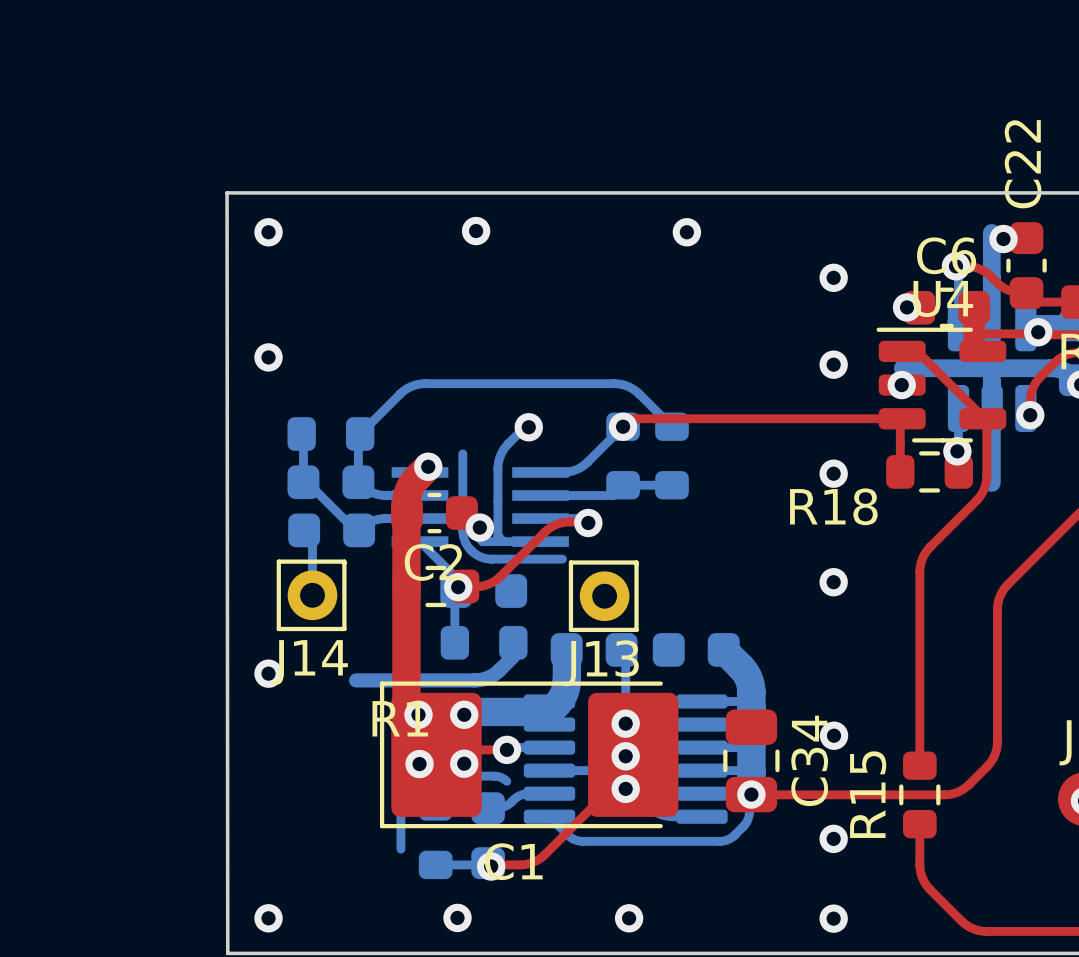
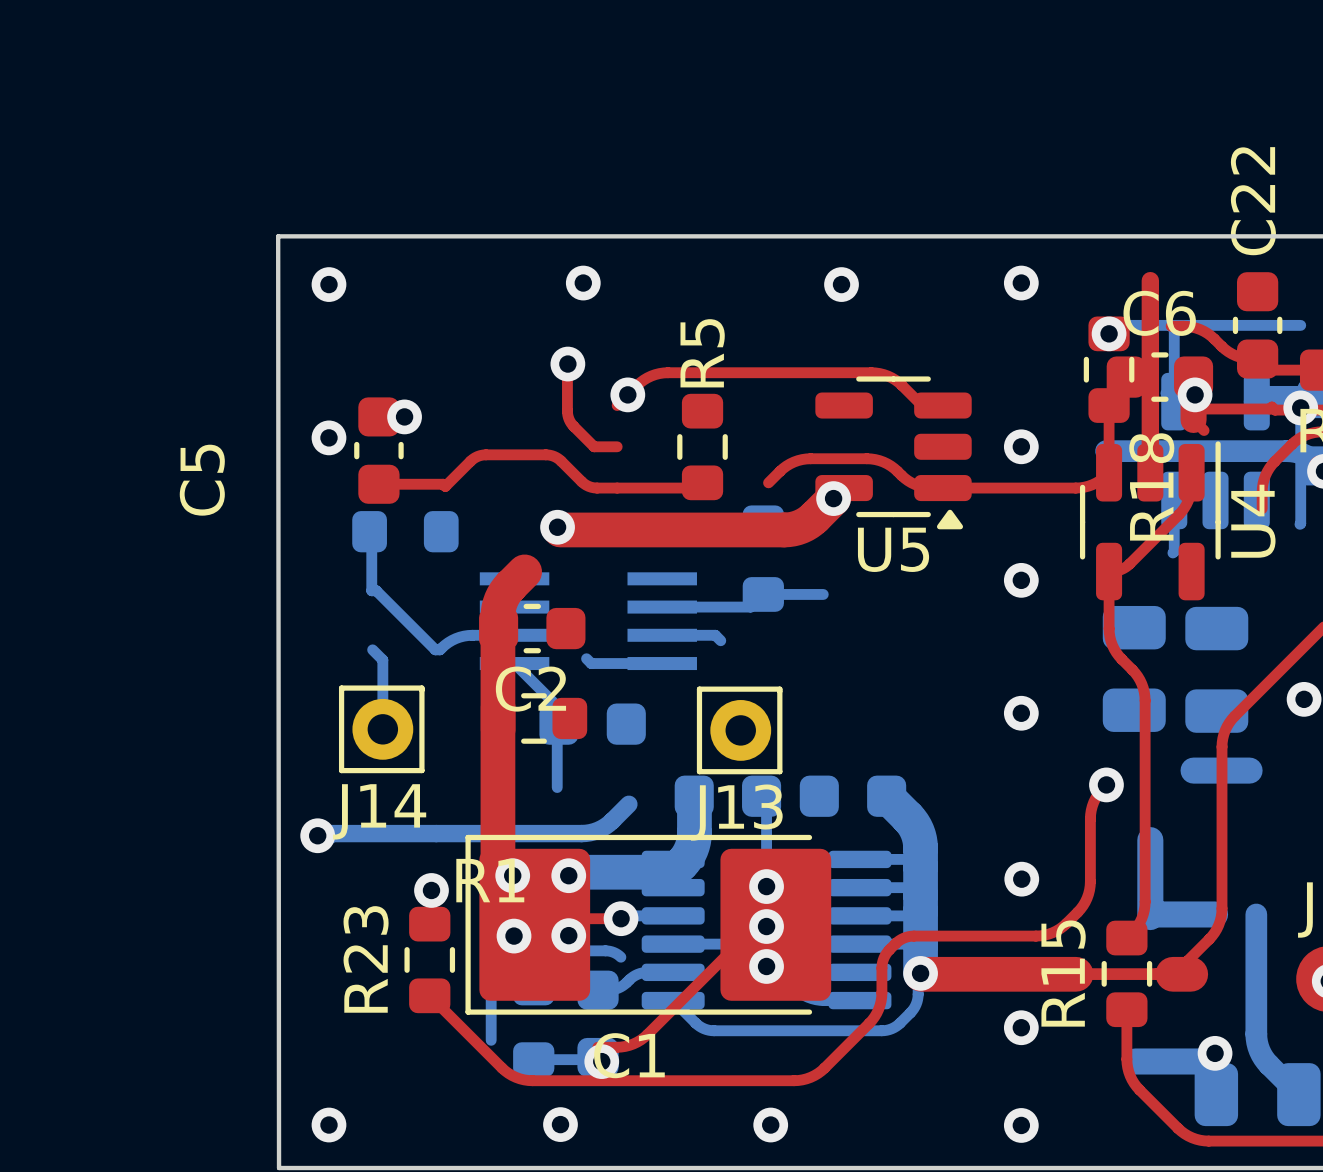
top track: none -> (1150, 280) (1150, 472)
via: none -> (1021, 283)
bottom track: (991, 232) (991, 482) -> none
via: (1003, 239) -> none
bottom track: none -> (1300, 325) (1117, 325) (1109, 333)
via: (955, 266) -> none
via: none -> (1109, 333)
via: (833, 277) -> none
top track: none -> (567, 353) (567, 411) (570, 421) (594, 446) (617, 446)
via: none -> (567, 364)
via: (907, 307) -> none
via: none -> (627, 394)
via: none -> (1195, 394)
top track: none -> (617, 405) (643, 380) (655, 374) (667, 372) (875, 372) (895, 380) (922, 405) (942, 405)
top track: none -> (1109, 405) (1109, 472) (1096, 482) (1084, 487) (927, 487) (911, 482) (887, 463) (866, 458) (802, 459) (786, 466) (768, 482)
via position: (1038, 332) -> (1300, 407)
bottom track: none -> (1300, 407) (1299, 524)
via: none -> (404, 416)
top track: (902, 351) (917, 351) (986, 422) (986, 475) (984, 489) (976, 500) (927, 549) (920, 565) (919, 765) -> (1191, 472) (1189, 496) (1181, 511) (1127, 565) (1118, 570) (1109, 571) (1109, 628) (1110, 641) (1118, 656) (1139, 680) (1145, 700) (1144, 906) (1139, 922) (1126, 938)
U5: none -> (893, 452)
via: (901, 385) -> none
U4 rotation: 0° (941, 385) -> 90° clockwise (1150, 520)
top track: none -> (702, 482) (697, 488) (594, 487) (583, 483) (559, 459) (552, 455) (485, 454) (472, 459) (445, 486) (443, 484) (378, 484)
top track: none -> (844, 488) (811, 520) (800, 526) (788, 529) (560, 529) (557, 527)
via: (1030, 415) -> none
bottom track: (533, 419) (505, 446) (498, 461) (497, 536) (503, 541) -> none
top track: (623, 426) (631, 418) (902, 418) (900, 420) (900, 471) -> none
bottom track: (623, 426) (579, 468) (566, 472) (540, 472) -> none
via position: (623, 426) -> (833, 498)
bottom track: (671, 426) (636, 391) (621, 384) (414, 385) (402, 391) (358, 435) (358, 482) (369, 491) (379, 494) (420, 495) -> none
via: (528, 427) -> none
via: none -> (557, 527)
via: (957, 451) -> none
bottom track: (462, 453) (462, 533) (466, 543) (471, 550) -> none
R5 side: bottom (671, 455) -> top (702, 447)
via: (428, 466) -> none
R18 rotation: 0° (929, 471) -> 90° clockwise (1109, 369)
R18 position: (929, 471) -> (1109, 369)
C5 side: bottom (330, 482) -> top (378, 450)
R18 name position: R18 (833, 506) -> R18 (1151, 486)
top track: (592, 521) (566, 522) (552, 526) (495, 580) (482, 586) (462, 586) -> none
via: (588, 522) -> none
via: (479, 527) -> none
part: (331, 530) -> none
part: none -> (1134, 668)
part: none -> (1216, 669)
bottom track: (471, 550) (487, 558) (562, 559) -> none
via: none -> (1304, 699)
via: (458, 587) -> none
bottom track: none -> (1193, 770) (1249, 770)
top track: none -> (1106, 784) (1095, 798) (1091, 810) (1088, 894) (1080, 909) (1066, 923) (1052, 932) (1040, 935) (913, 936) (901, 939) (887, 951) (883, 960) (881, 1001) (874, 1016) (824, 1067) (806, 1078) (793, 1080) (524, 1079) (505, 1070) (429, 995)
via: none -> (1106, 784)
part: (484, 642) -> none
via position: (268, 673) -> (317, 835)
bottom track: none -> (436, 833) (331, 833) (328, 835)
bottom track: none -> (1150, 840) (1150, 917)
via: none -> (431, 890)
via position: (834, 735) -> (1021, 879)
bottom track: none -> (1215, 914) (1152, 914) (1135, 932)
bottom track: none -> (1256, 914) (1257, 1042) (1266, 1061) (1298, 1094)
top track: none -> (775, 924) (757, 924) (640, 1039) (625, 1046) (597, 1047)
C34: (751, 760) -> none
top track: (623, 775) (539, 858) (523, 864) (483, 864) -> none
R23: none -> (429, 959)
top track: none -> (920, 973) (1190, 974)
via: none -> (1215, 1053)
bottom track: none -> (1135, 1061) (1214, 1061) (1216, 1063)
part: none -> (1257, 1094)

